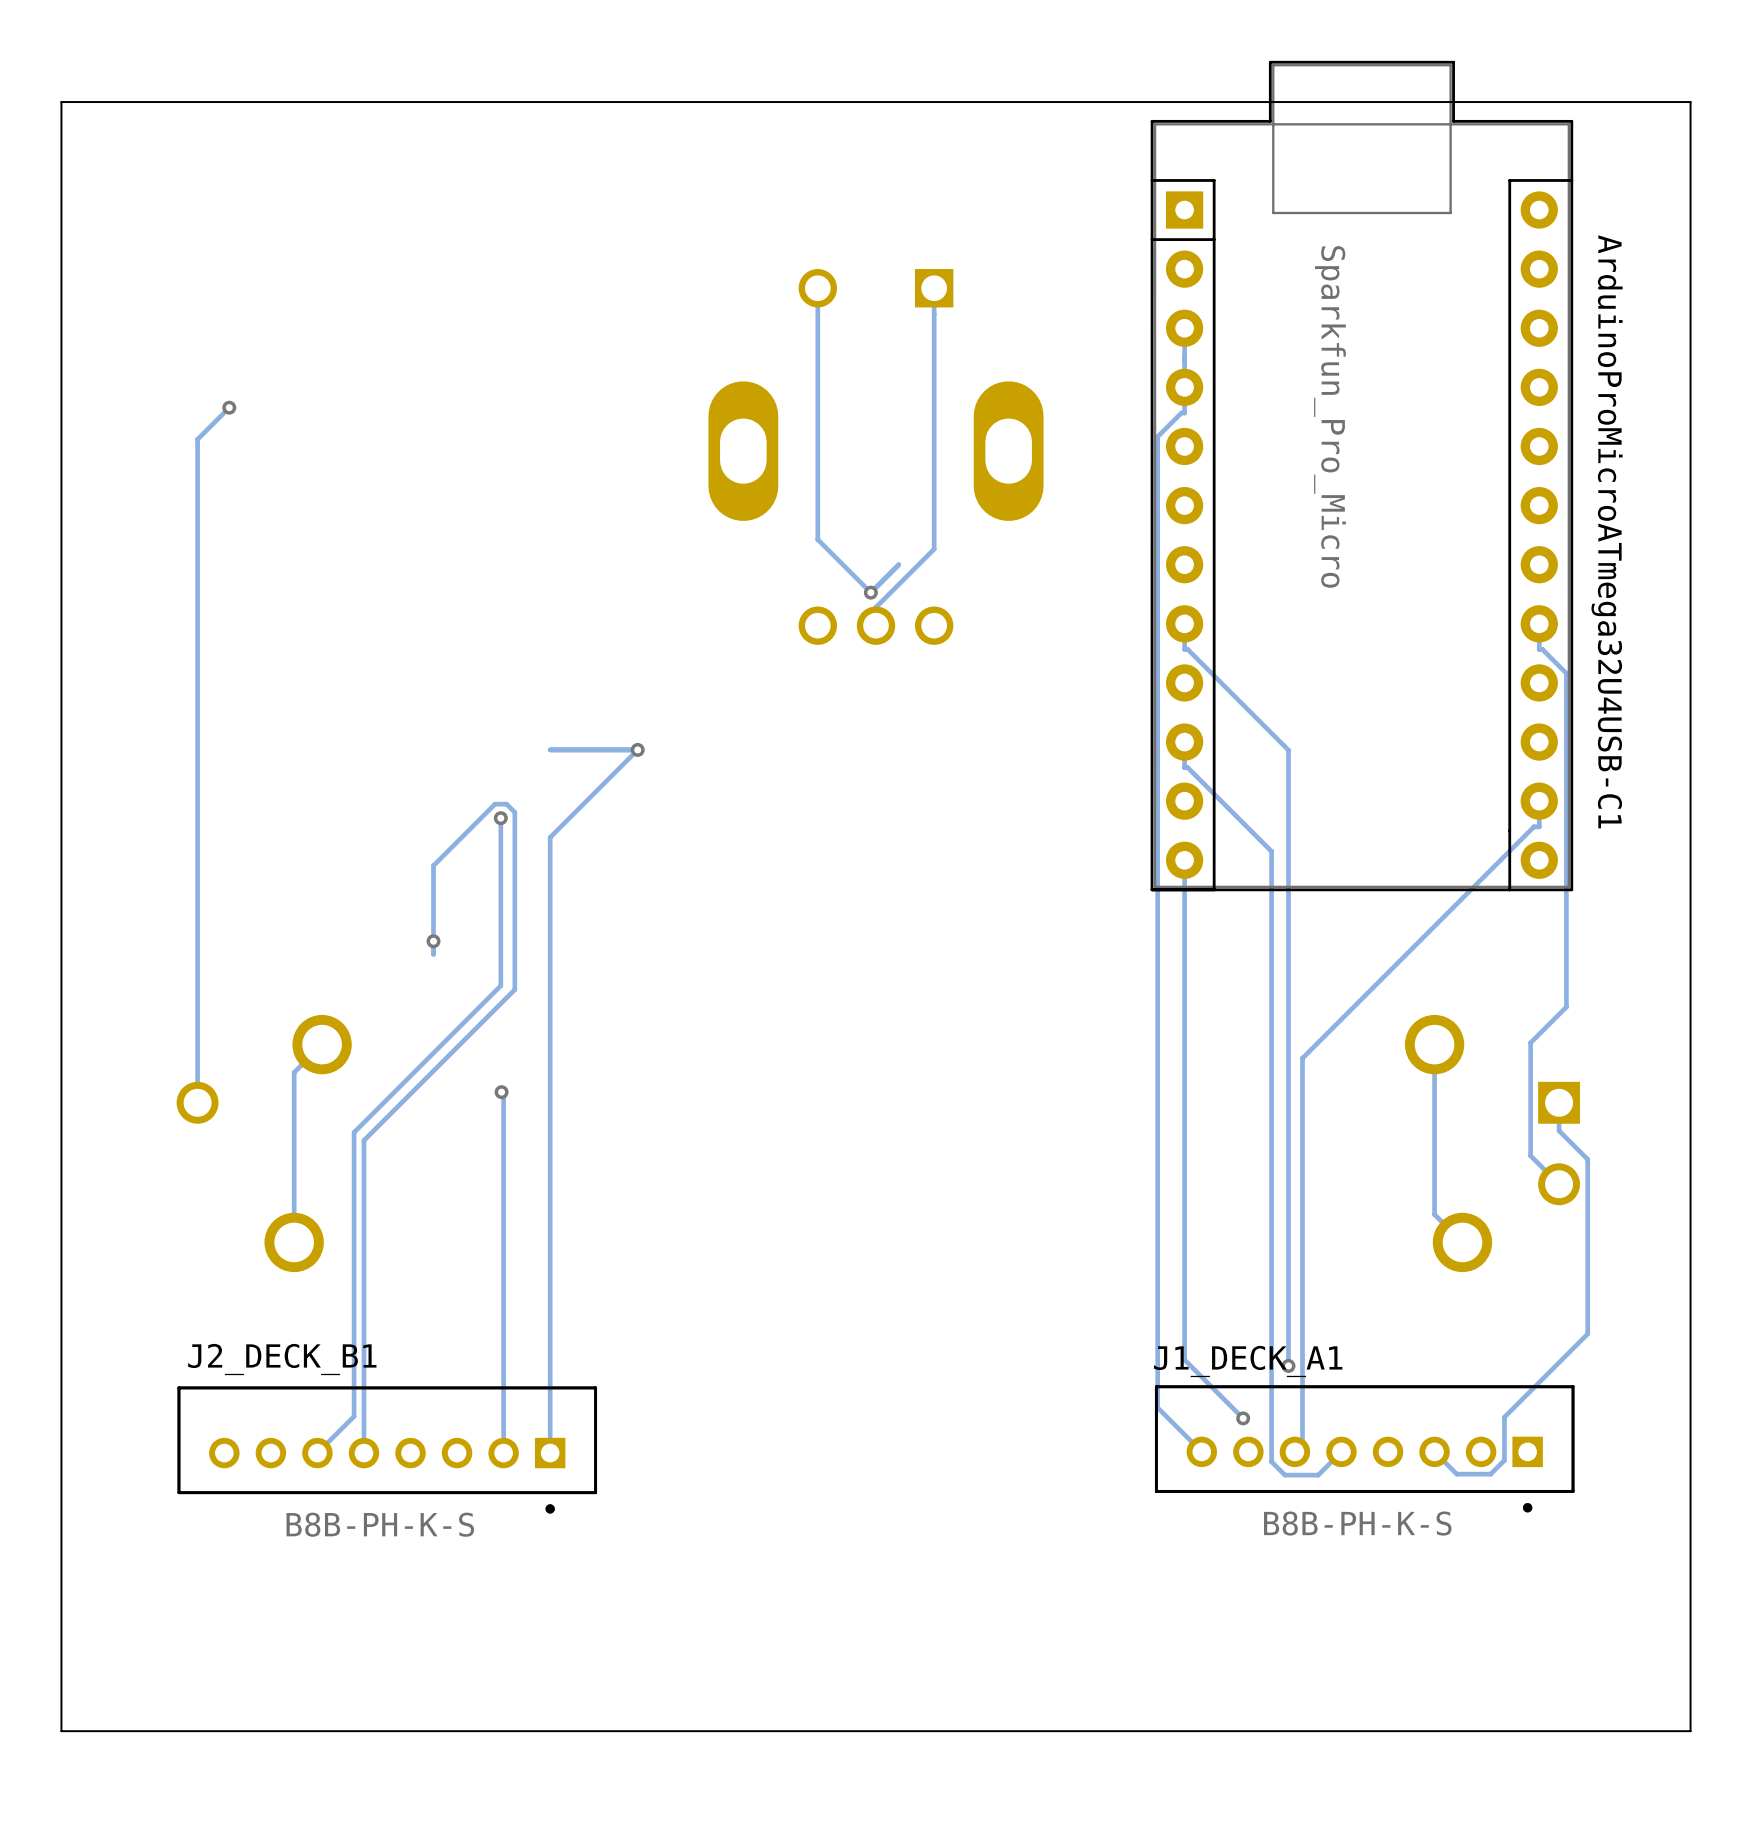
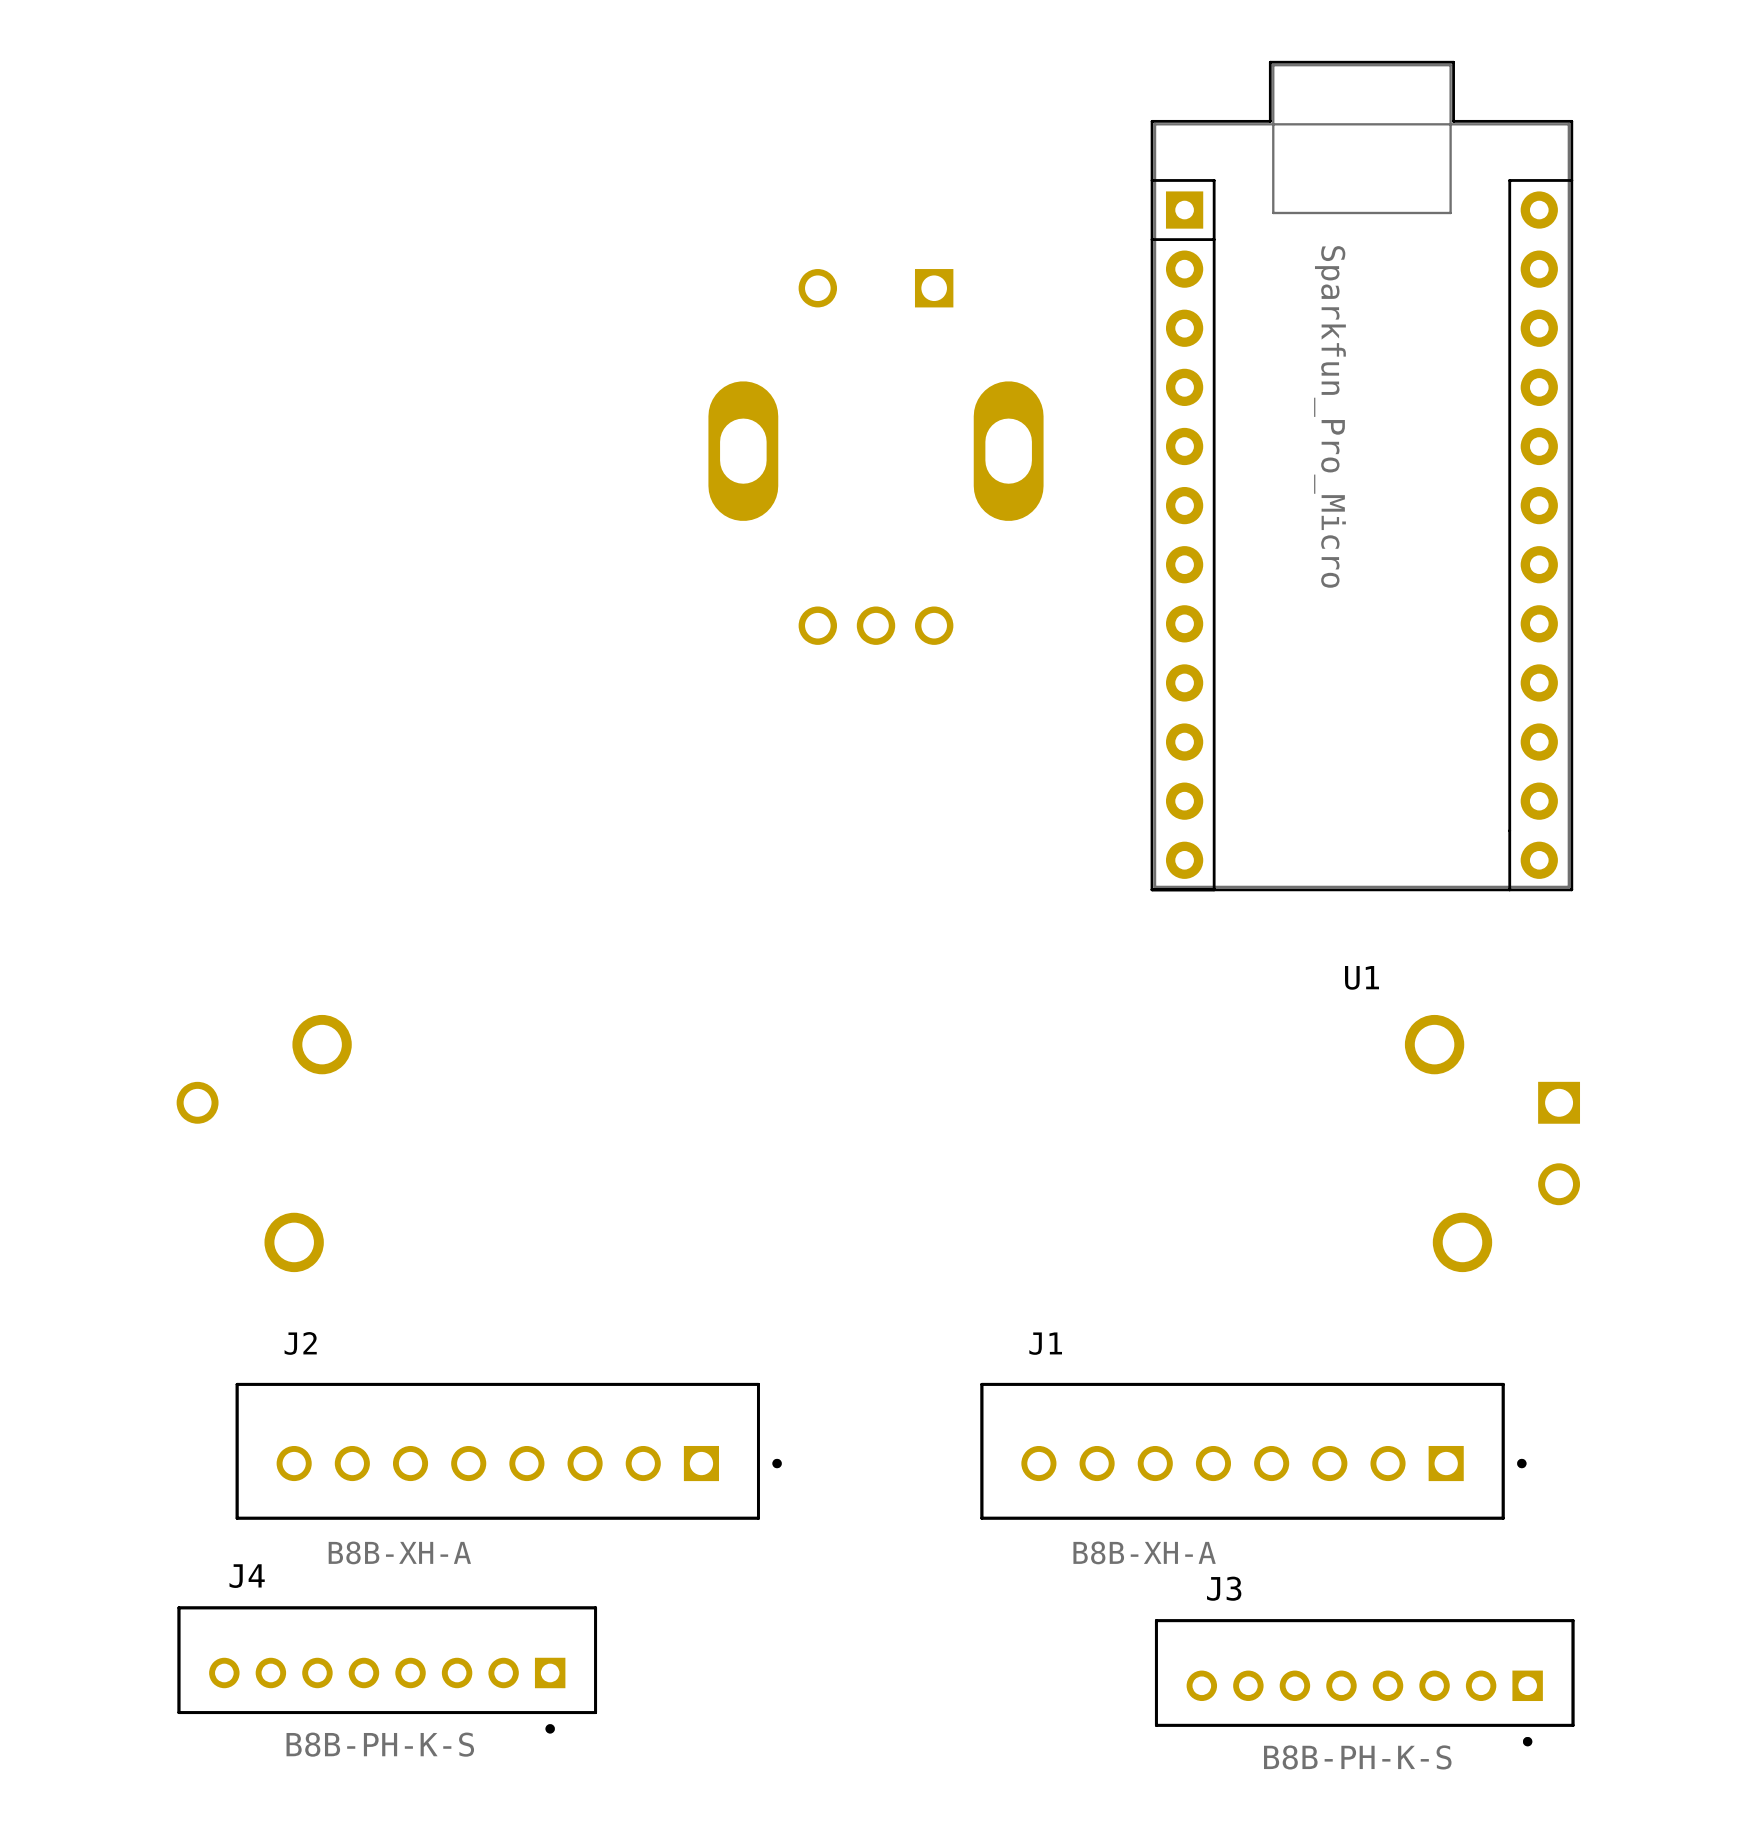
board edge: (1690, 102) (61, 102) (61, 1731) (1690, 1731) (1690, 102) -> none
track: (817, 288) (817, 539) (870, 592) (898, 564) -> none
track: (934, 288) (934, 549) (876, 607) (875, 625) -> none
track: (1184, 328) (1184, 413) (1181, 413) (1157, 436) (1157, 1407) (1201, 1451) -> none
track: (229, 407) (197, 439) (197, 1102) -> none
via: (229, 407) -> none
ArduinoProMicroATmega32U4USB-C1 name: ArduinoProMicroATmega32U4USB-C1 (1607, 531) -> U1 (1362, 977)
via: (870, 592) -> none
track: (1184, 623) (1184, 649) (1187, 649) (1288, 750) (1288, 1365) -> none
track: (1539, 623) (1539, 649) (1542, 649) (1566, 673) (1566, 1007) (1530, 1042) (1530, 1155) (1559, 1184) -> none
track: (1184, 742) (1184, 767) (1187, 767) (1271, 851) (1271, 1461) (1284, 1475) (1318, 1475) (1341, 1451) -> none
track: (550, 749) (637, 749) (550, 837) (550, 1453) -> none
via: (637, 749) -> none
track: (1539, 801) (1539, 826) (1533, 826) (1302, 1058) (1302, 1444) (1294, 1451) -> none
track: (500, 818) (500, 985) (354, 1132) (354, 1416) (317, 1453) -> none
via: (500, 818) -> none
track: (1184, 860) (1184, 1359) (1243, 1418) -> none
via: (433, 941) -> none
track: (433, 954) (433, 865) (495, 804) (506, 804) (514, 812) (514, 989) (363, 1140) (363, 1453) -> none
track: (322, 1044) (294, 1072) (294, 1242) -> none
track: (1434, 1044) (1434, 1214) (1462, 1242) -> none
via: (501, 1092) -> none
track: (504, 1092) (501, 1092) (503, 1094) (503, 1453) -> none
track: (1559, 1102) (1559, 1130) (1587, 1159) (1587, 1333) (1504, 1417) (1504, 1460) (1490, 1474) (1456, 1474) (1434, 1451) -> none
via: (1288, 1365) -> none
via: (1243, 1418) -> none
J1_DECK_A1: B8B-PH-K-S (1364, 1448) -> none
J2_DECK_B1: B8B-PH-K-S (387, 1449) -> none
J2: none -> B8B-XH-A (508, 1451)
J1: none -> B8B-XH-A (1253, 1451)
J4: none -> B8B-PH-K-S (387, 1669)
J3: none -> B8B-PH-K-S (1364, 1682)

